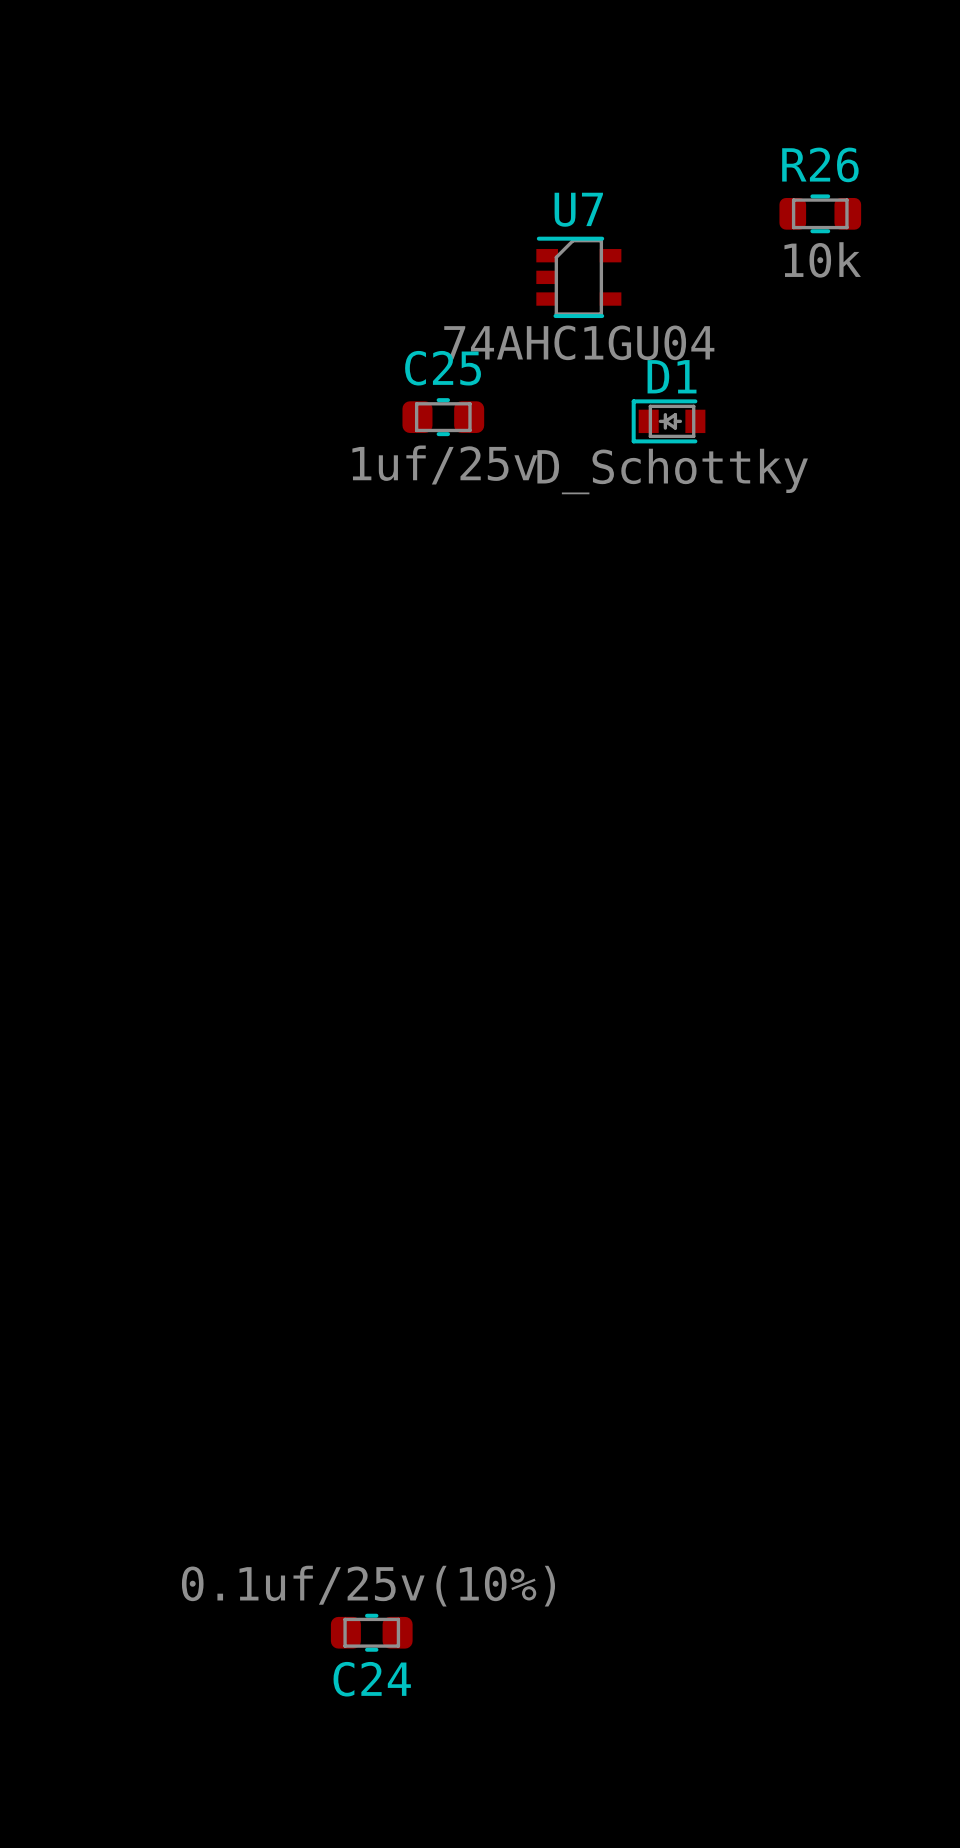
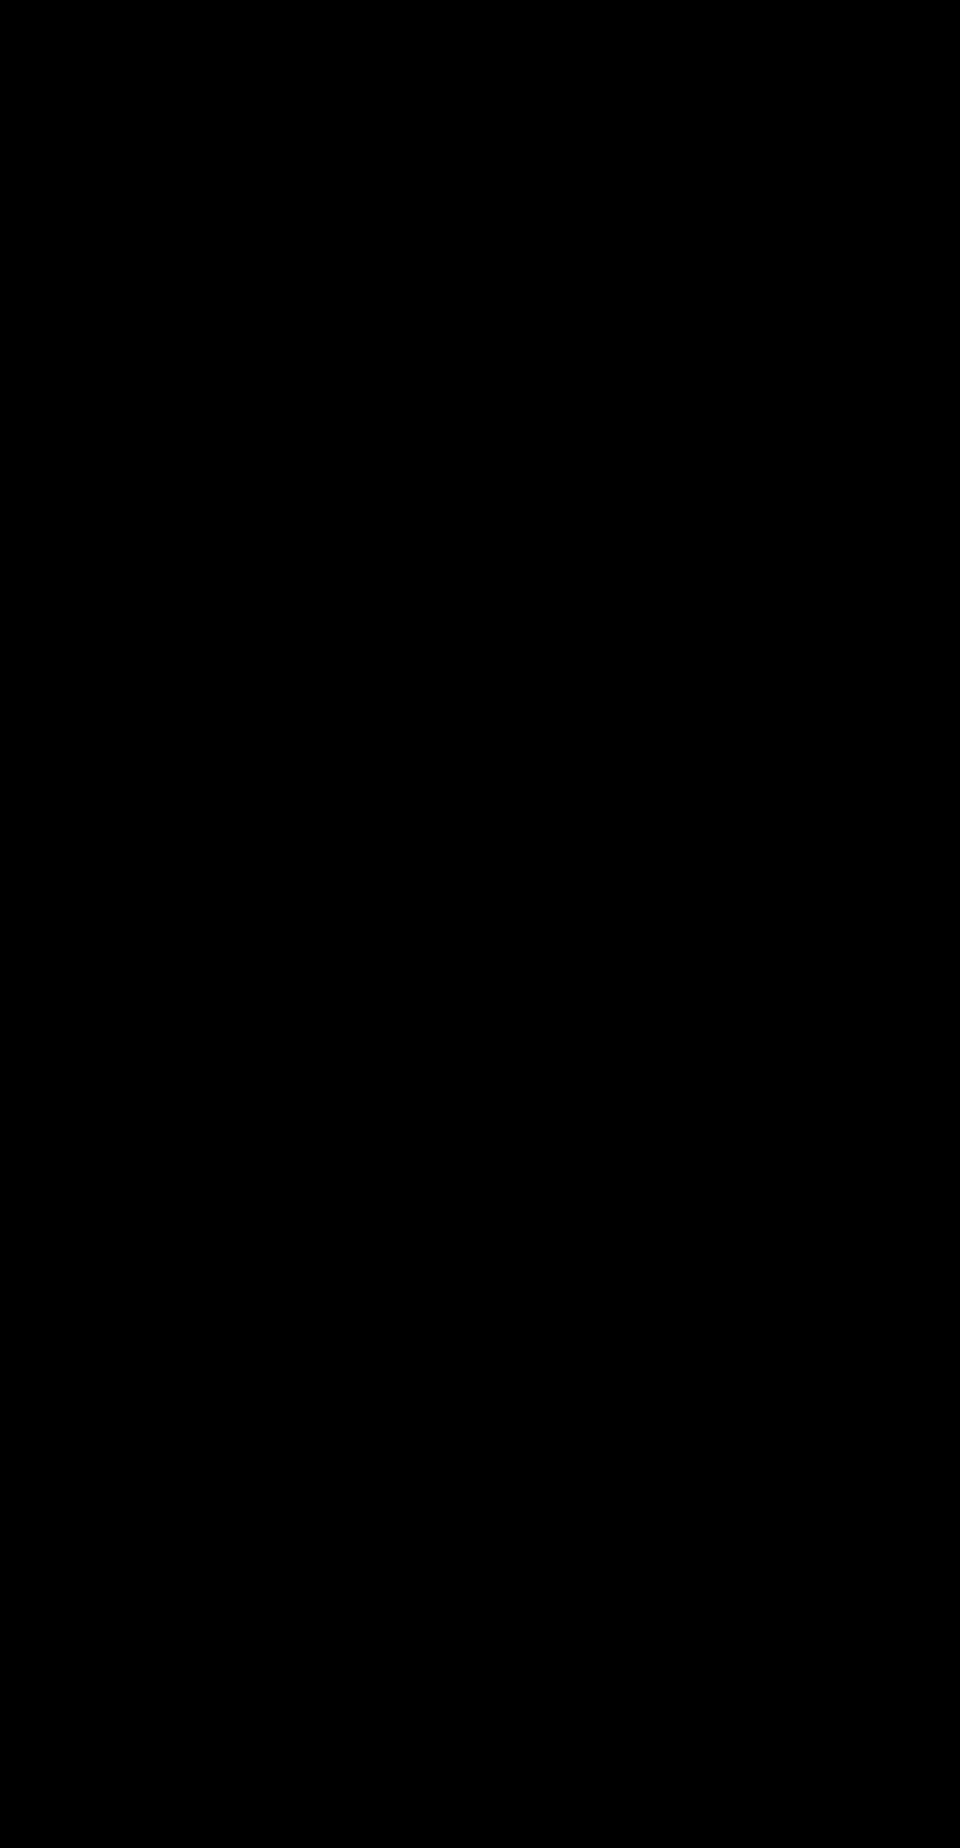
R26: 10k (820, 213) -> none
U7: 74AHC1GU04 (578, 277) -> none
C25: 1uf/25v (443, 417) -> none
D1: D_Schottky (668, 421) -> none
C24: 0.1uf/25v(10%) (371, 1632) -> none

